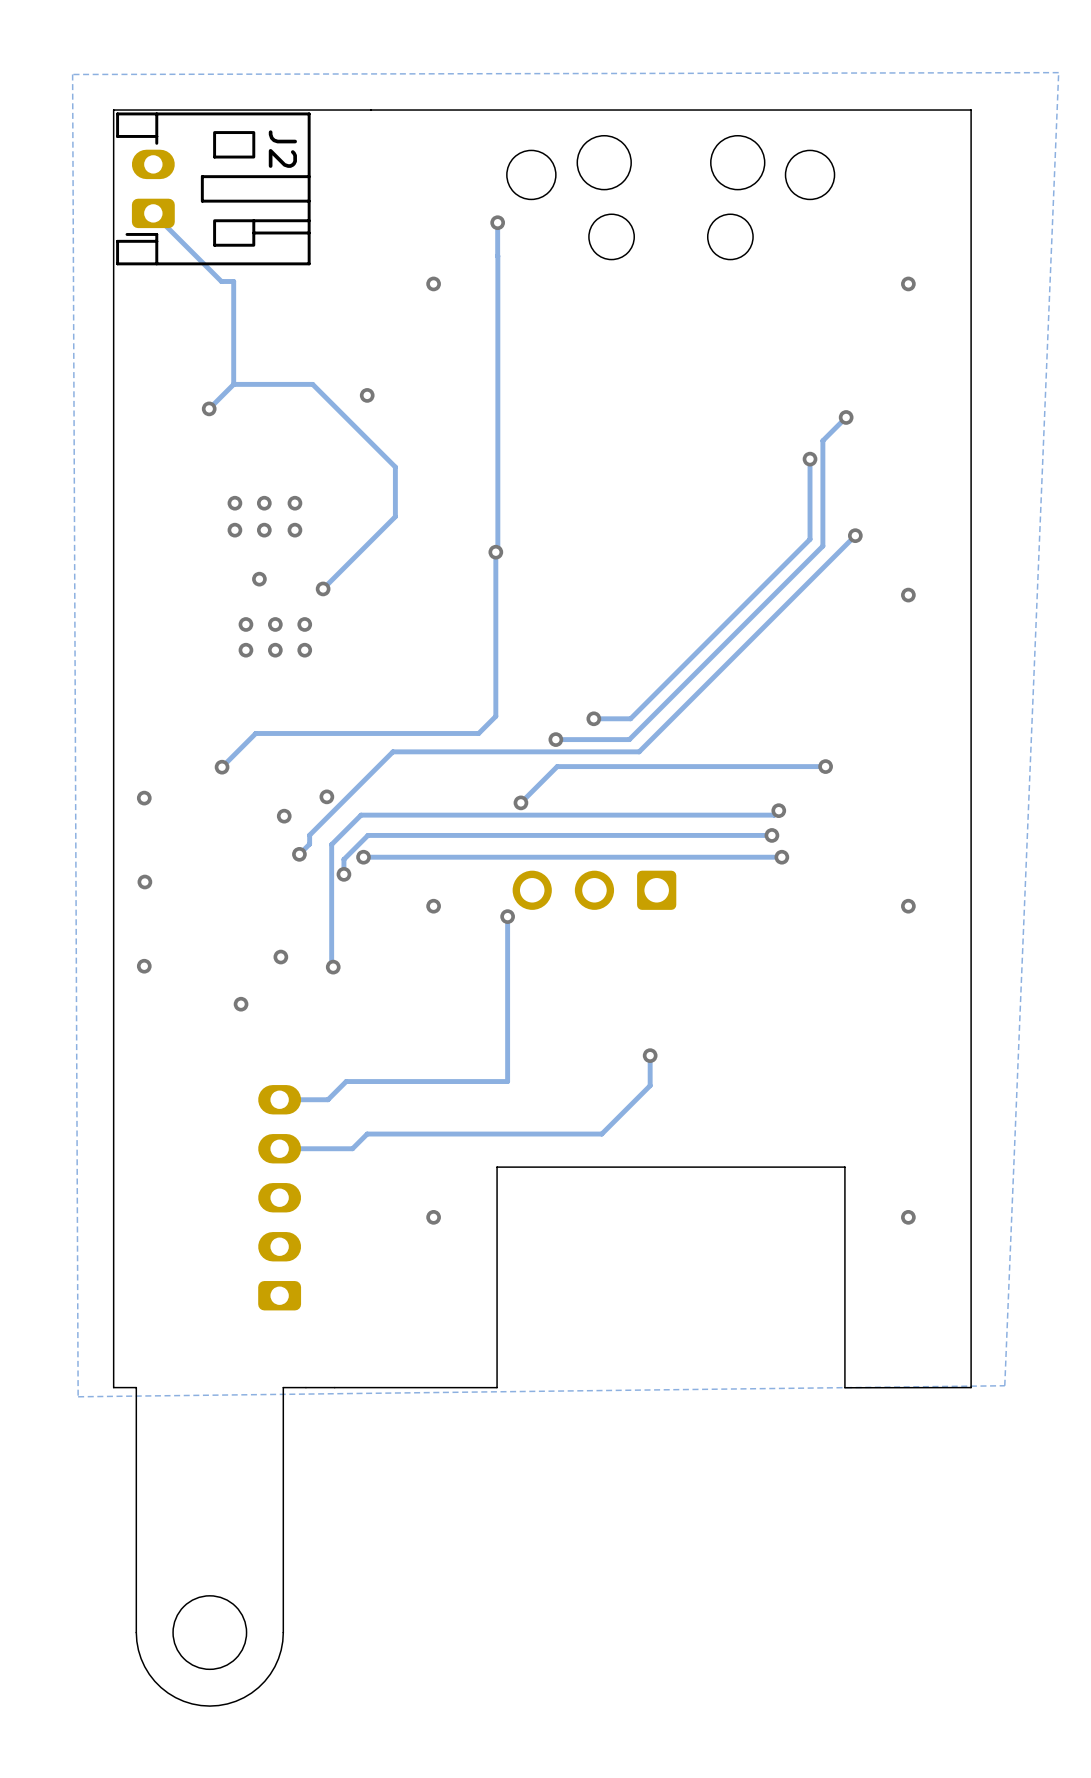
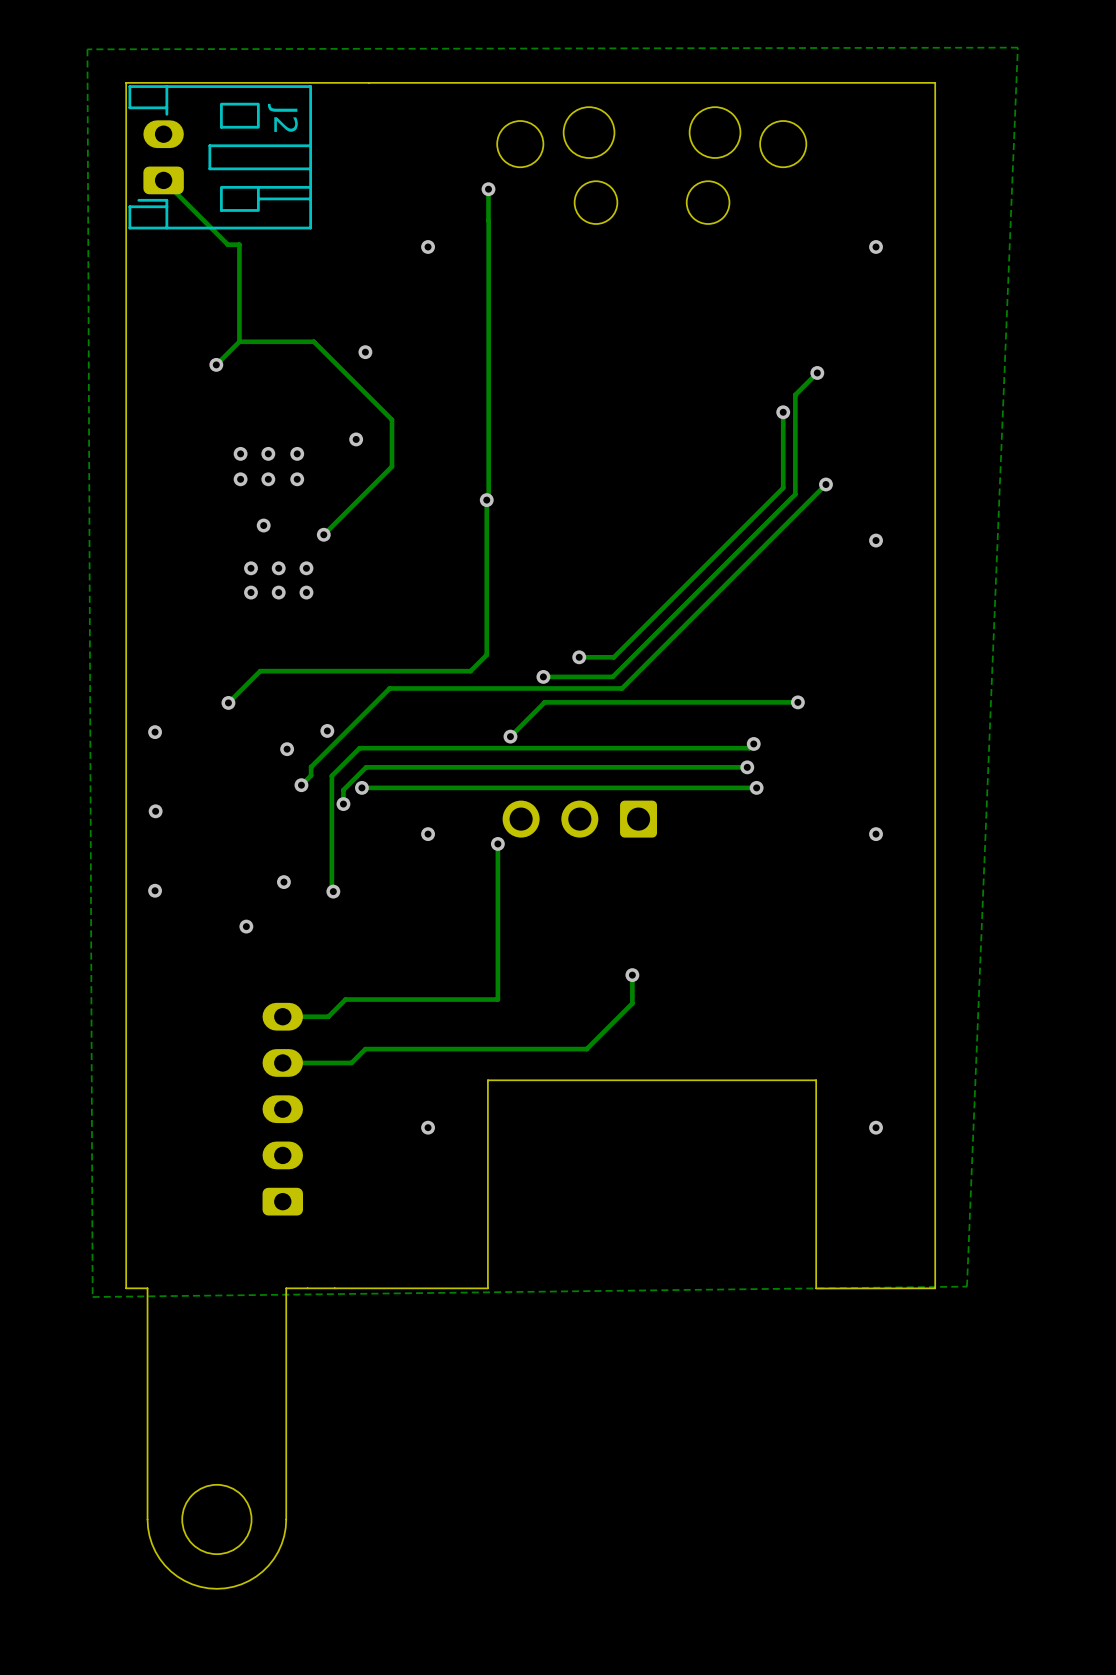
via: none -> (356, 439)

